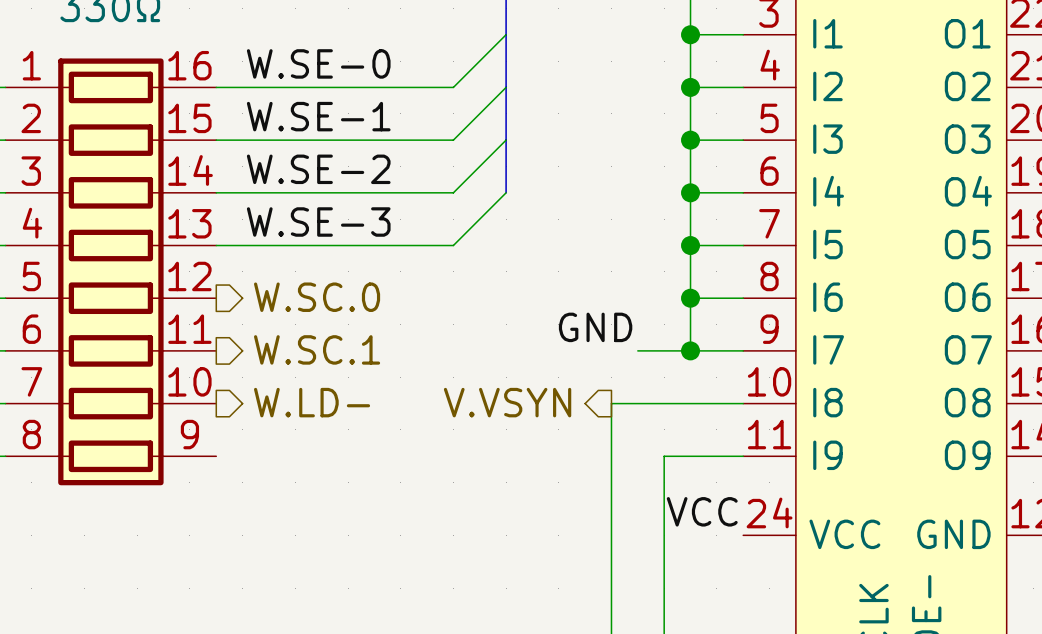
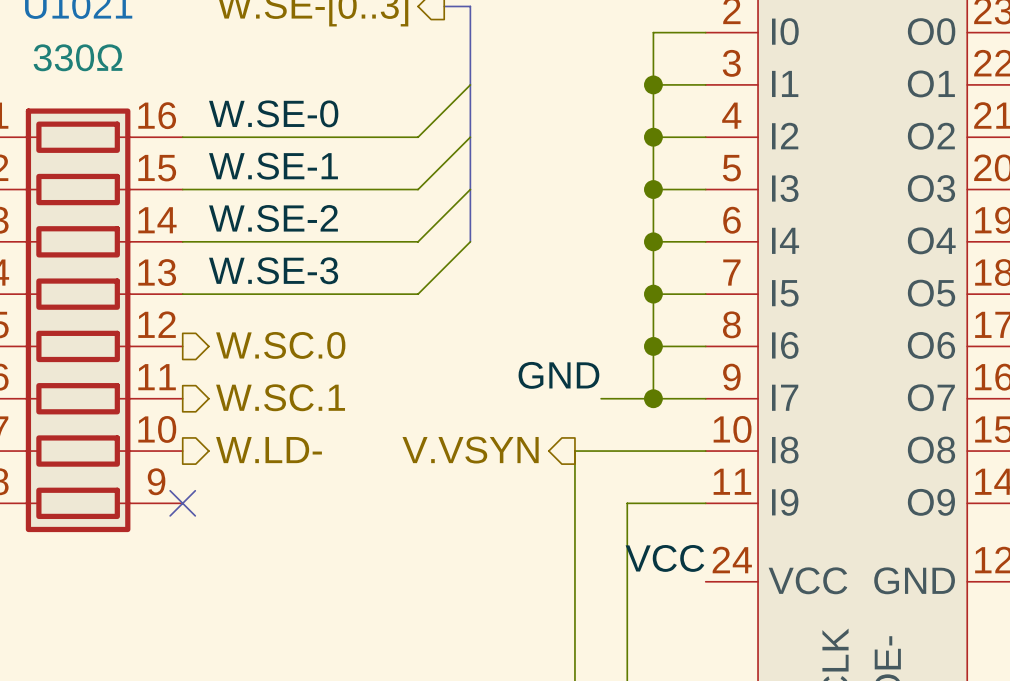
no-connect mark: none -> (182, 503)

